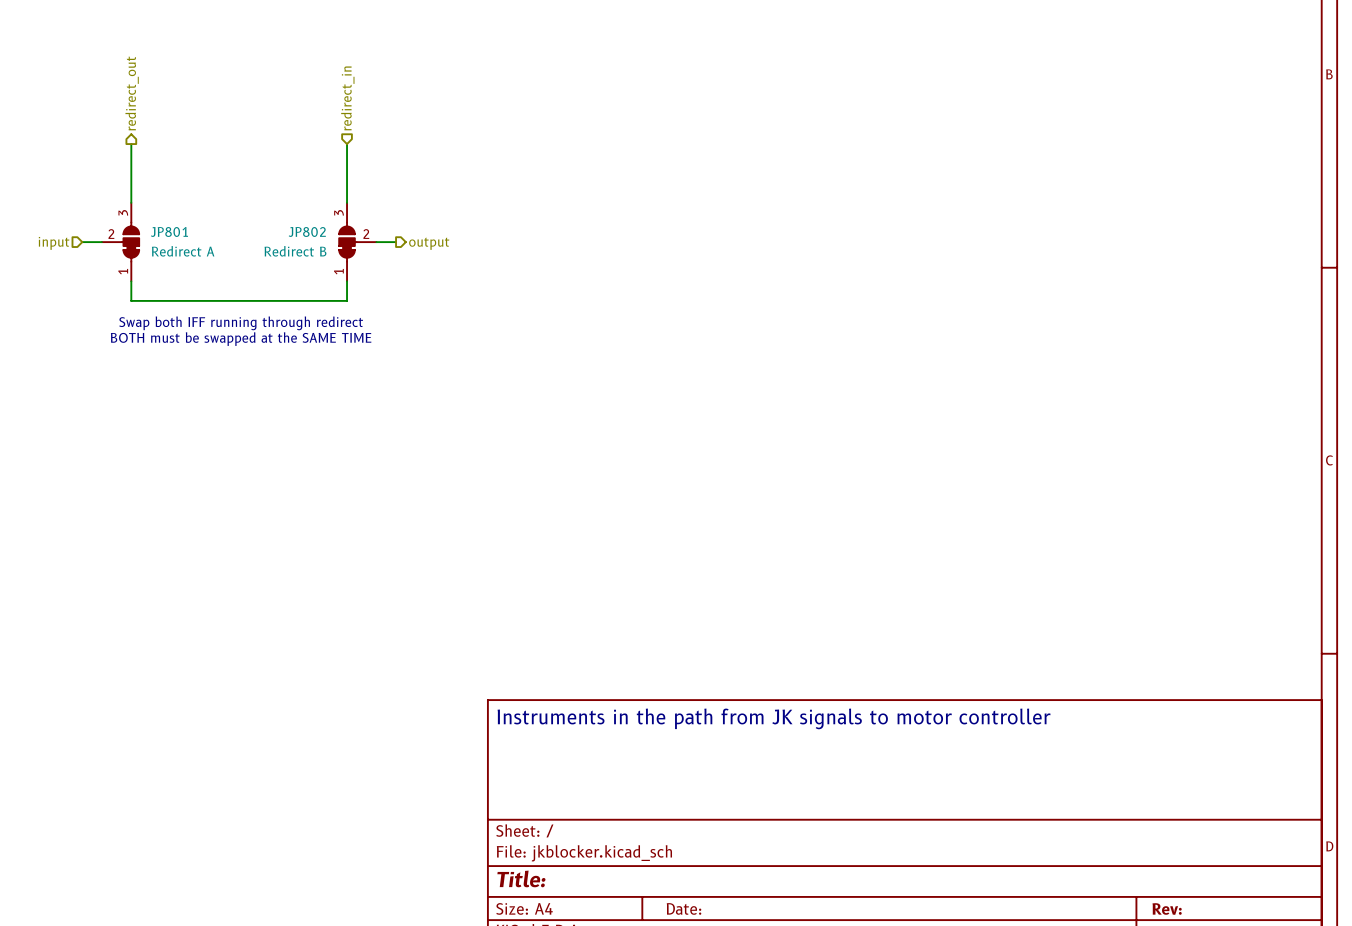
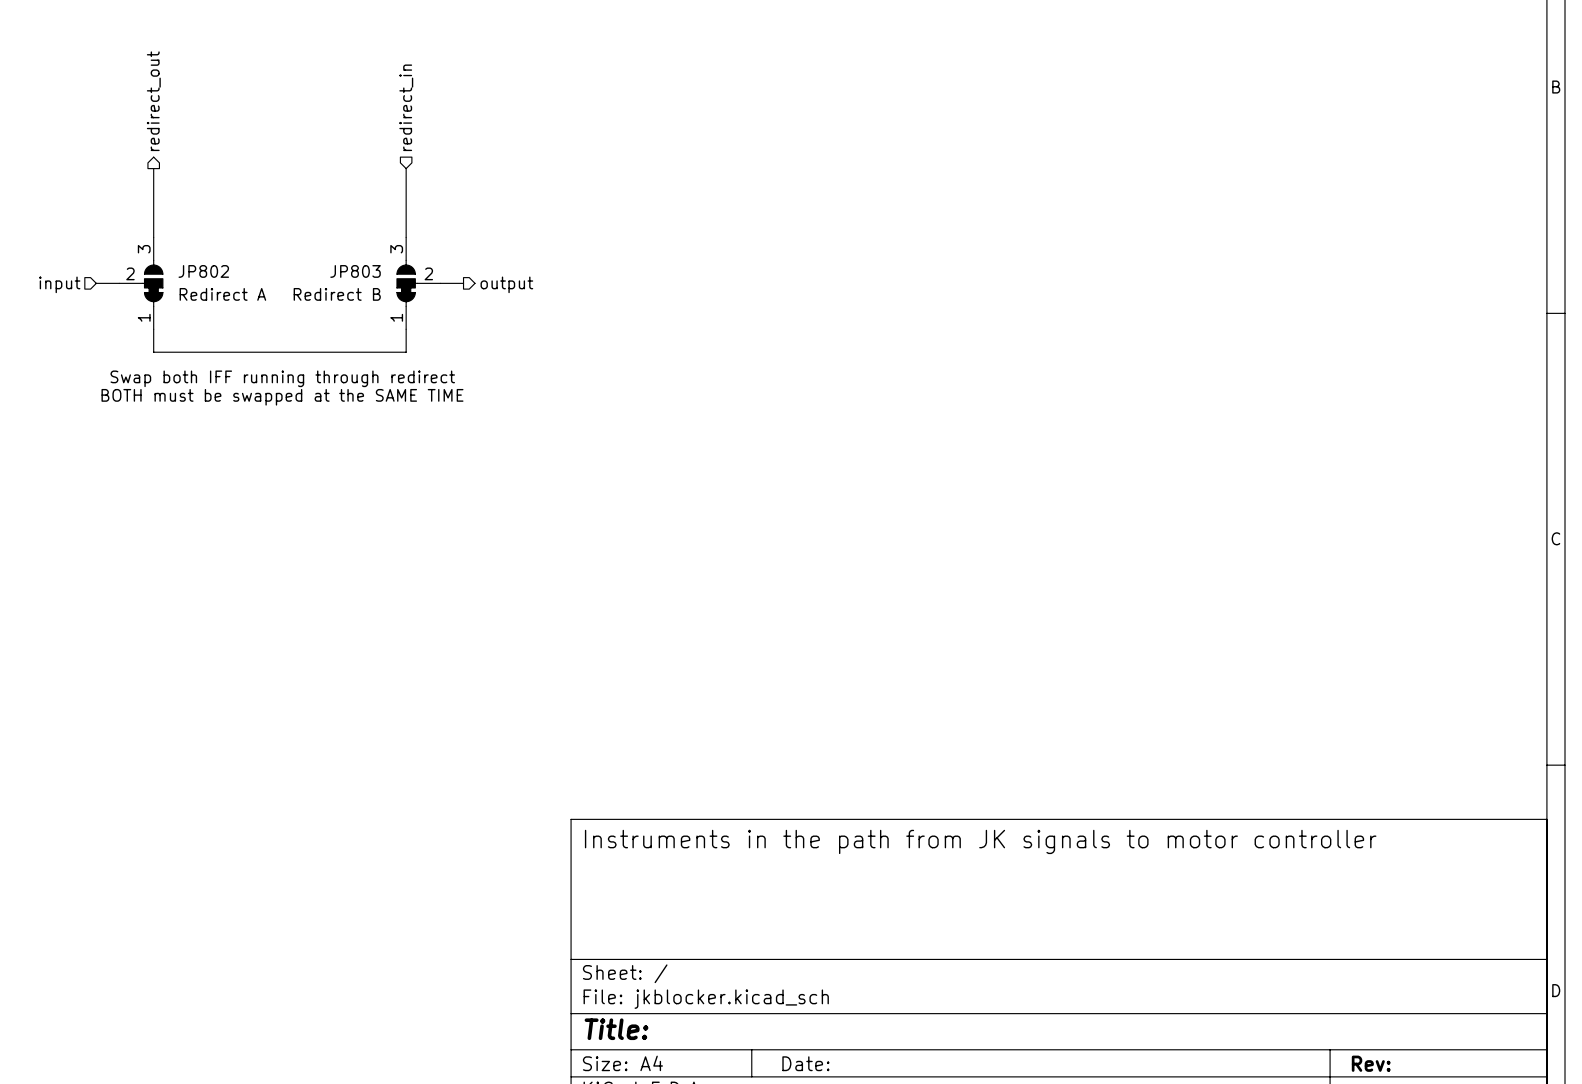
JP801 name: JP801 (169, 231) -> JP802 (203, 271)
JP802 name: JP802 (307, 231) -> JP803 (355, 271)

